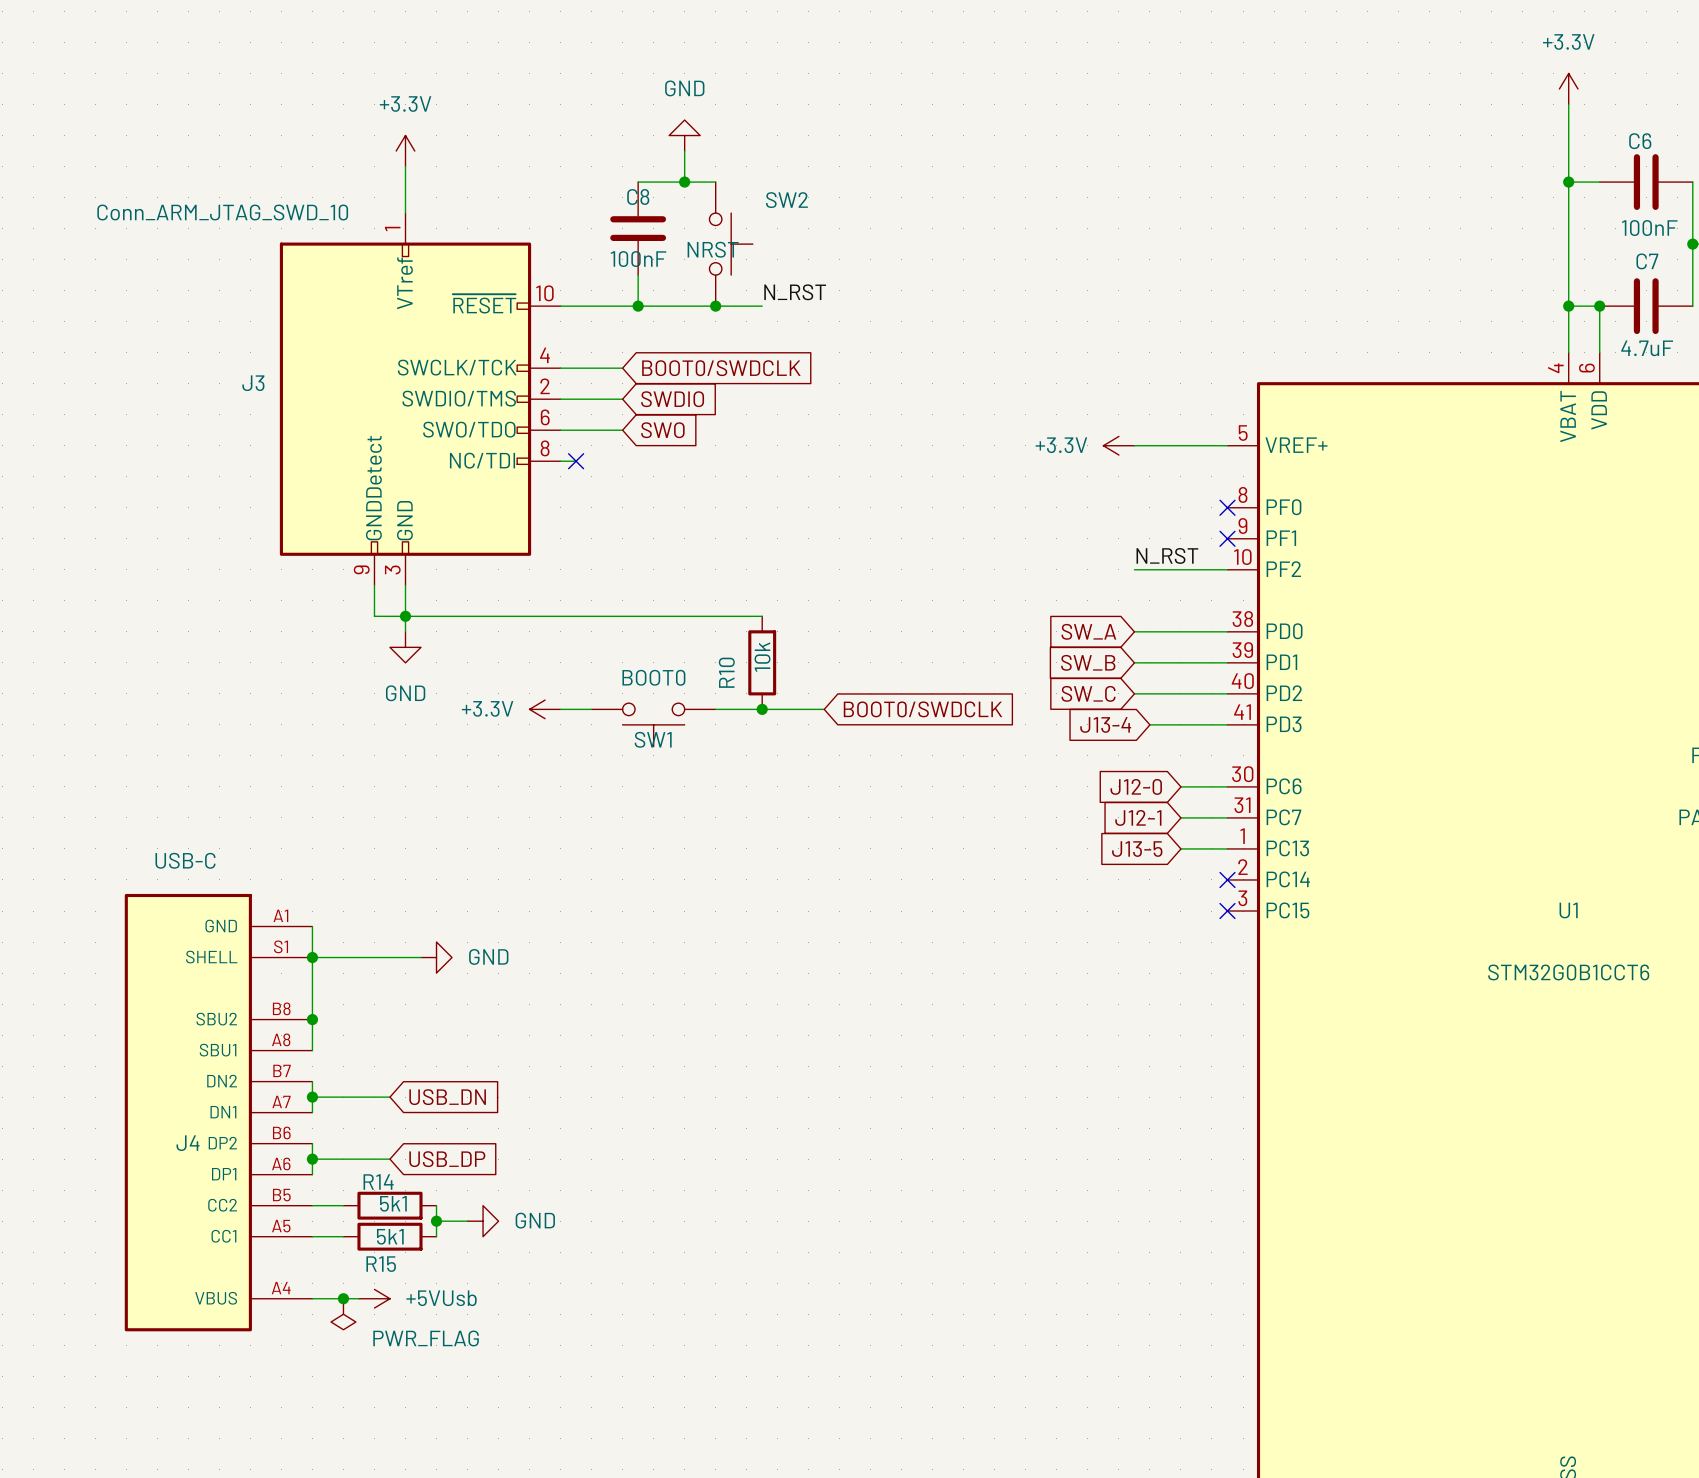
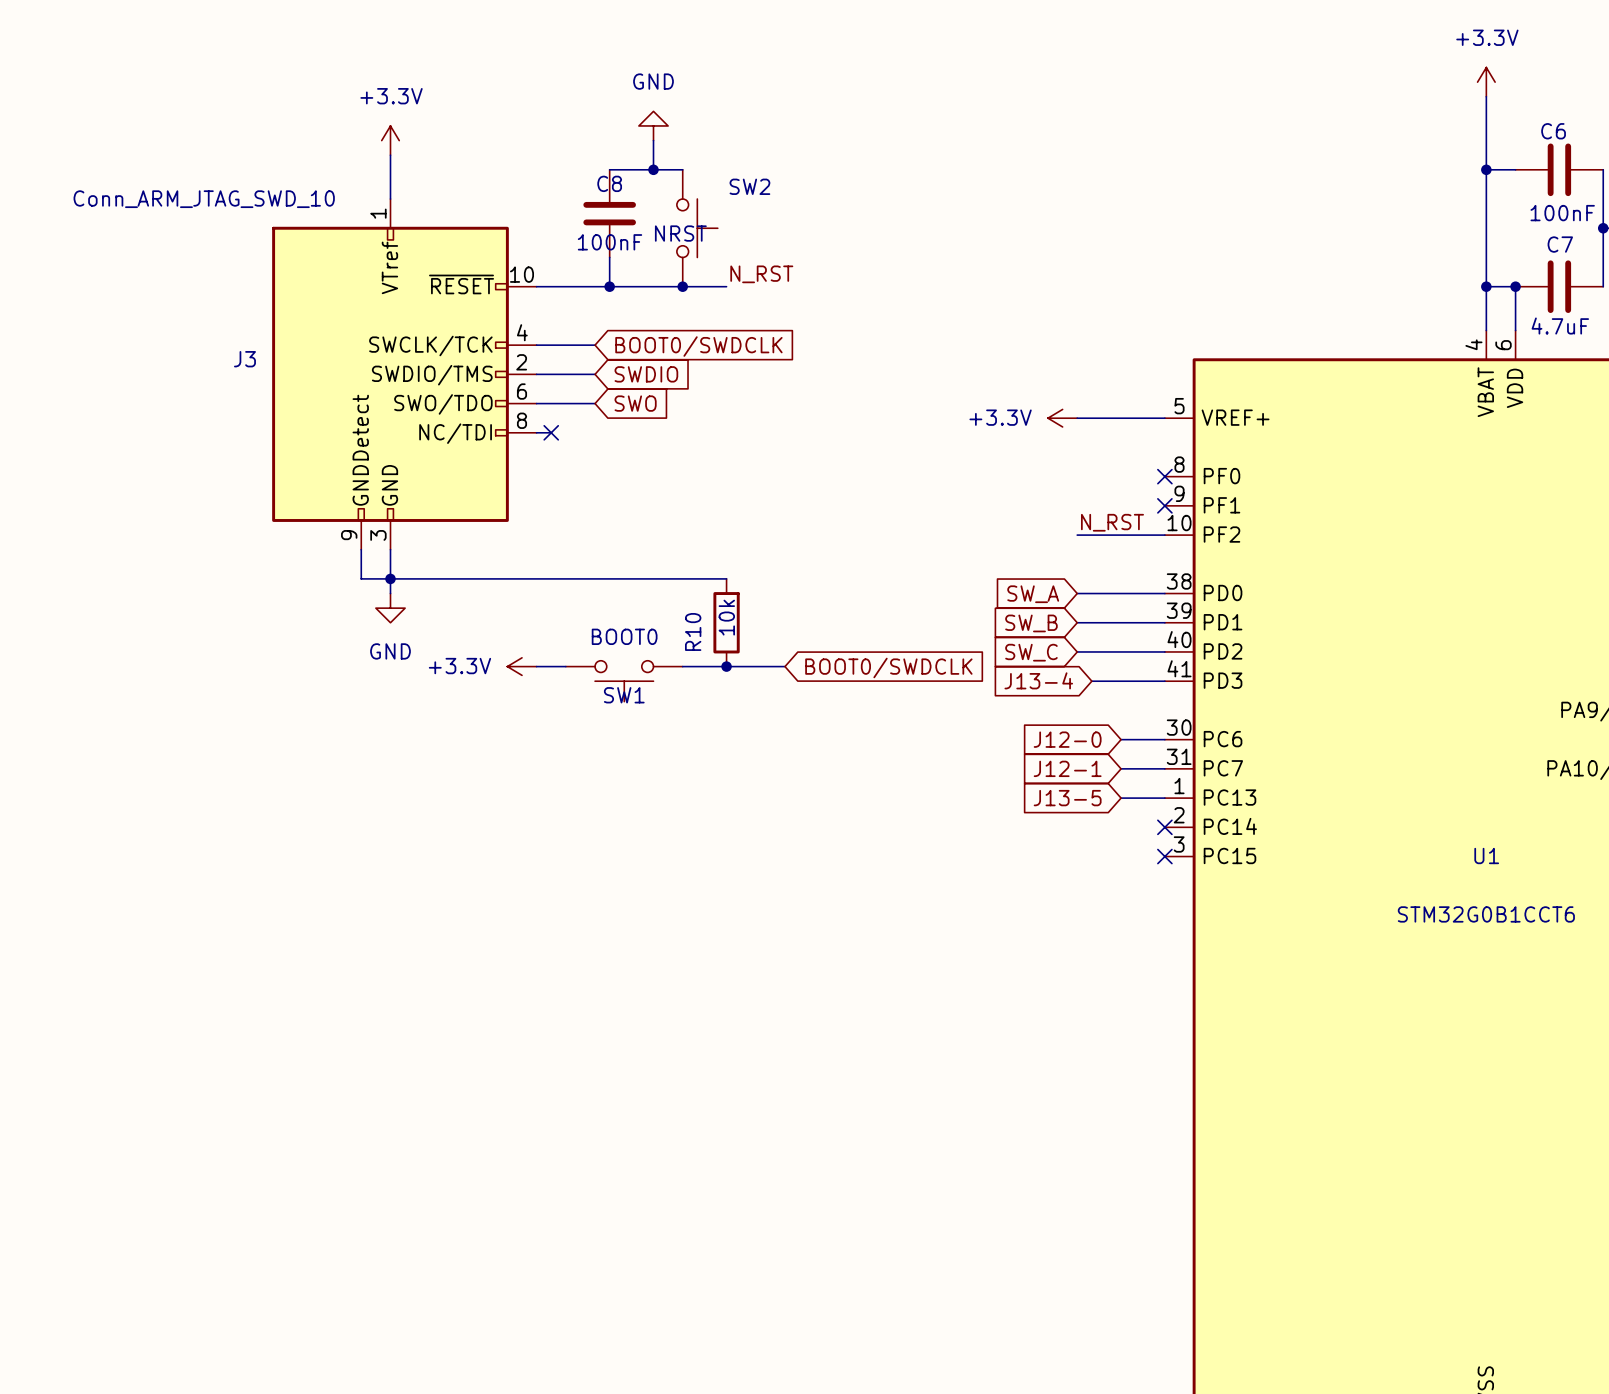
wire: (312, 926) (312, 1050) -> none
wire: (312, 957) (421, 957) -> none
junction: (312, 957) -> none
power symbol: GND (436, 957) -> none
junction: (312, 1019) -> none
wire: (312, 1081) (312, 1112) -> none
wire: (312, 1097) (389, 1097) -> none
junction: (312, 1097) -> none
global label: USB_DN (447, 1097) -> none
J4: USB-C (218, 1112) -> none
wire: (312, 1143) (312, 1174) -> none
wire: (312, 1159) (389, 1159) -> none
junction: (312, 1159) -> none
global label: USB_DP (447, 1159) -> none
wire: (312, 1205) (343, 1205) -> none
R14: 5k1 (389, 1205) -> none
wire: (436, 1205) (436, 1236) -> none
wire: (436, 1221) (467, 1221) -> none
junction: (436, 1221) -> none
power symbol: GND (483, 1221) -> none
wire: (312, 1236) (343, 1236) -> none
R15: 5k1 (389, 1236) -> none
wire: (312, 1298) (358, 1298) -> none
junction: (343, 1298) -> none
power symbol: +5VUsb (374, 1298) -> none
power symbol: PWR_FLAG (343, 1314) -> none

